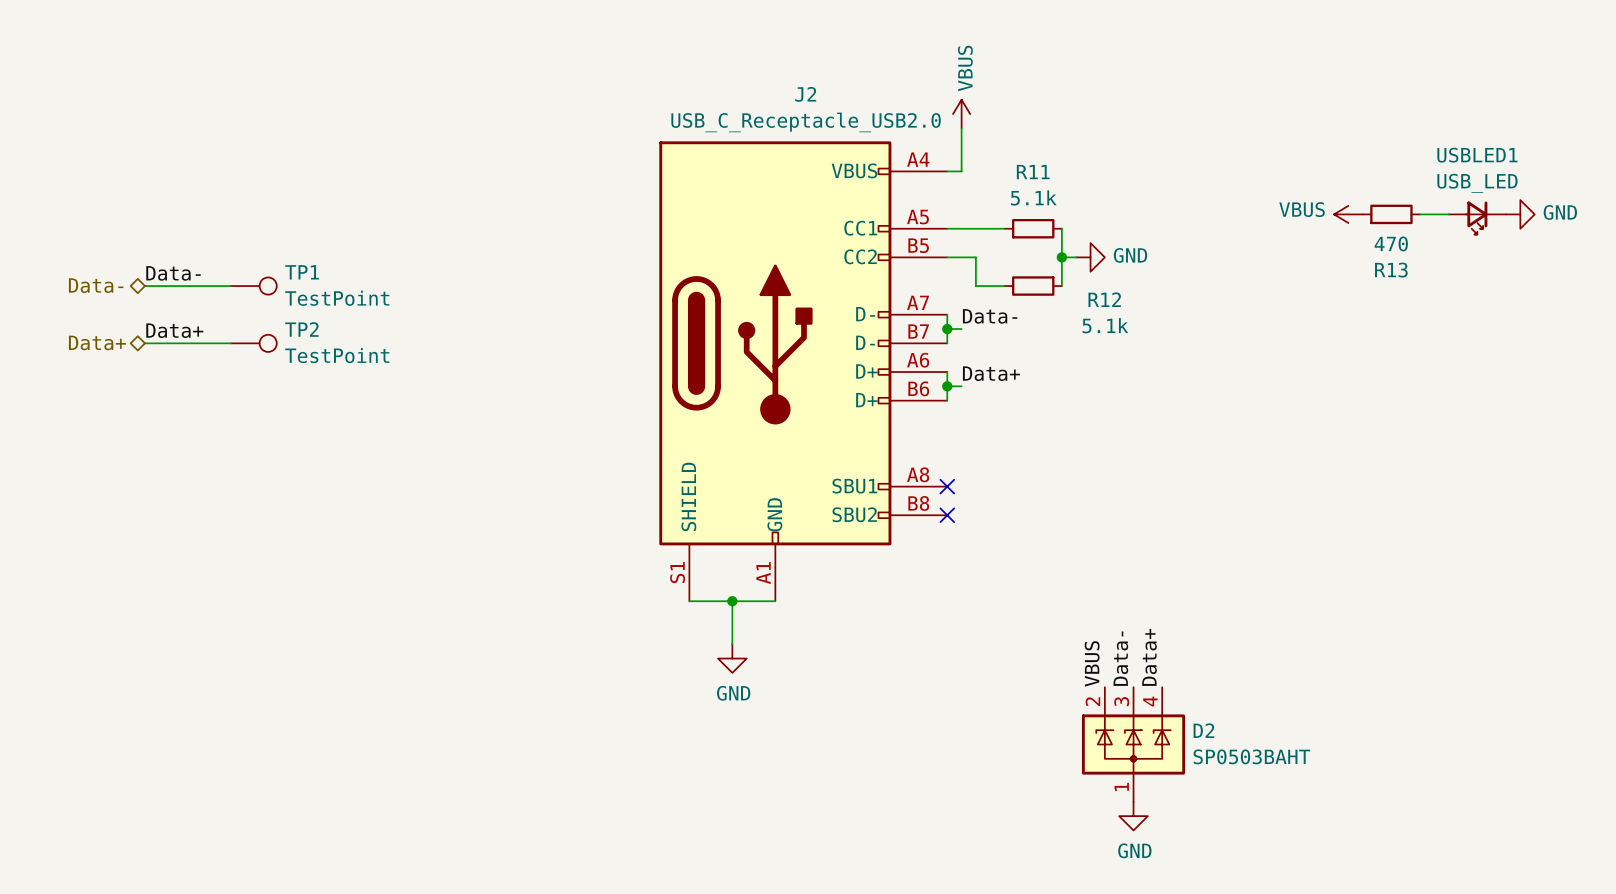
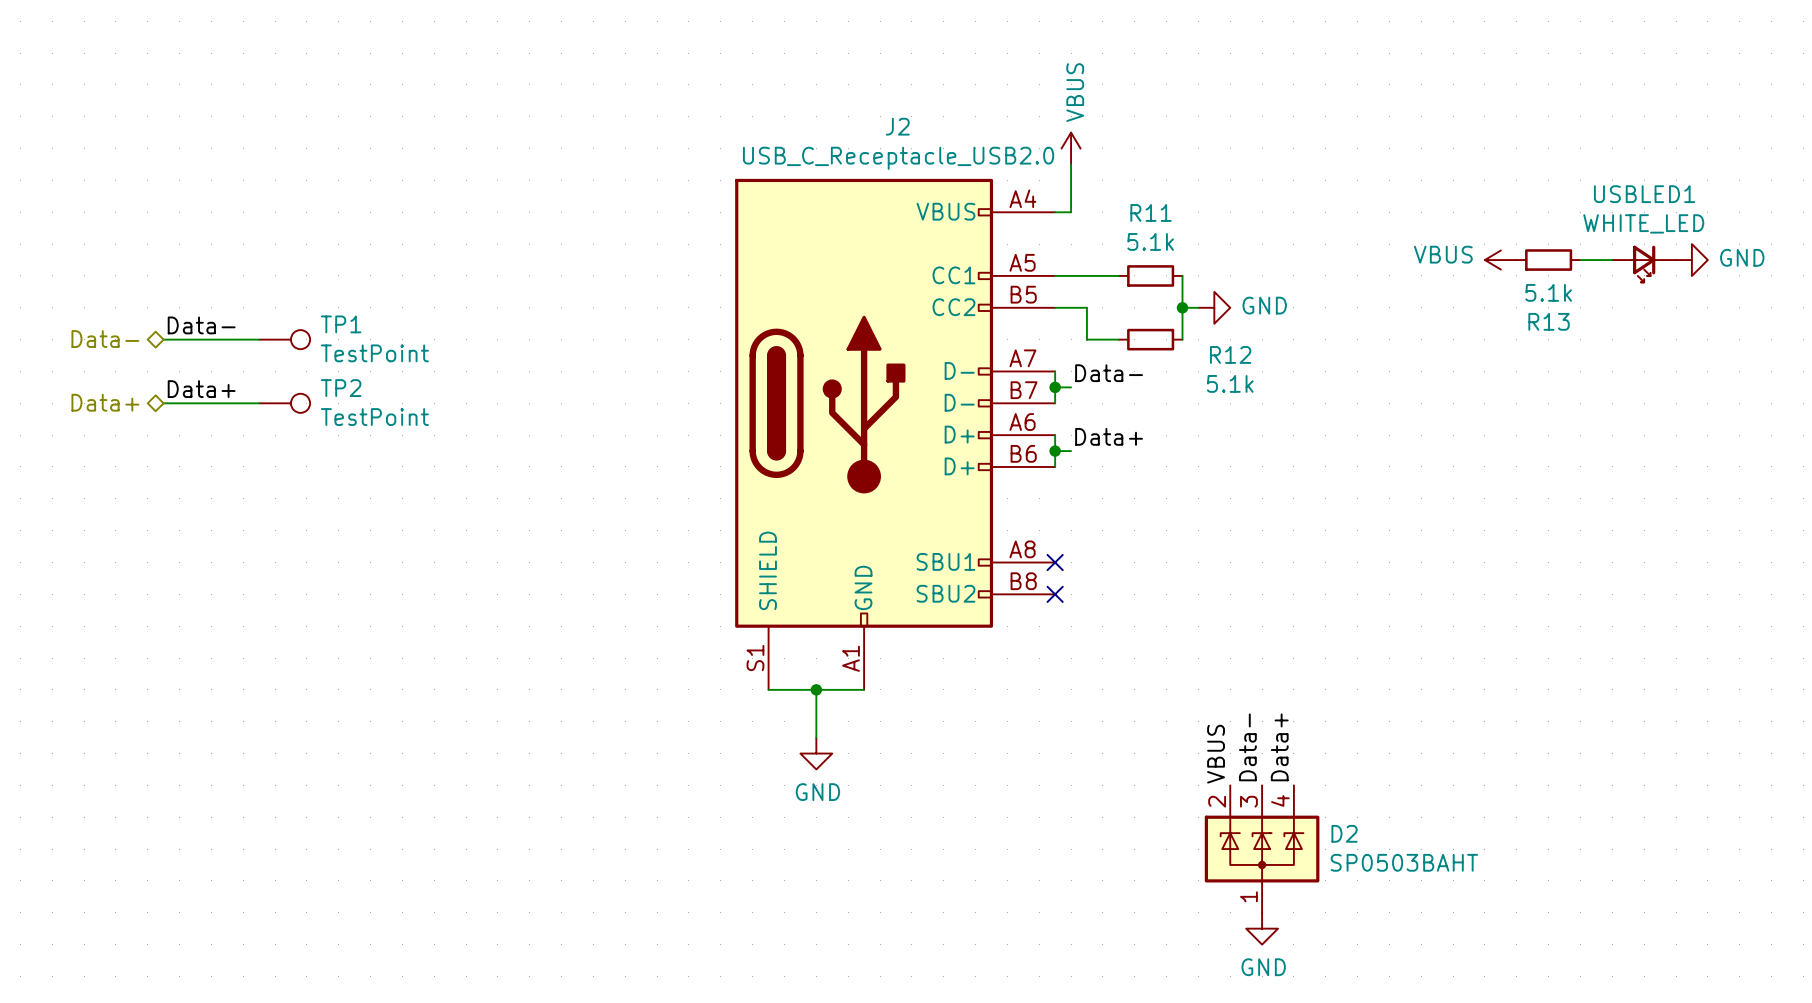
USBLED1 value: USB_LED (1477, 183) -> WHITE_LED (1643, 223)
R13 value: 470 (1391, 243) -> 5.1k (1548, 292)

